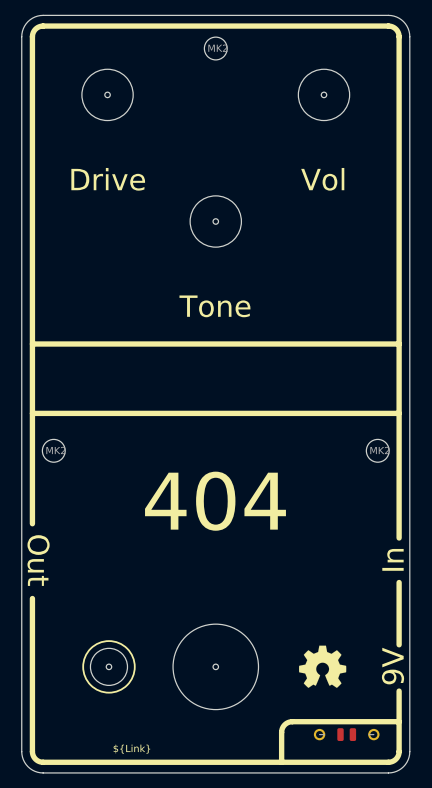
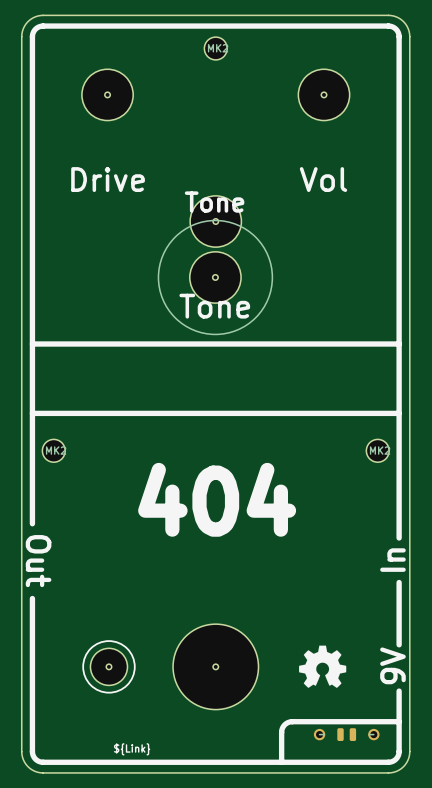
Tone: none -> (215, 277)

